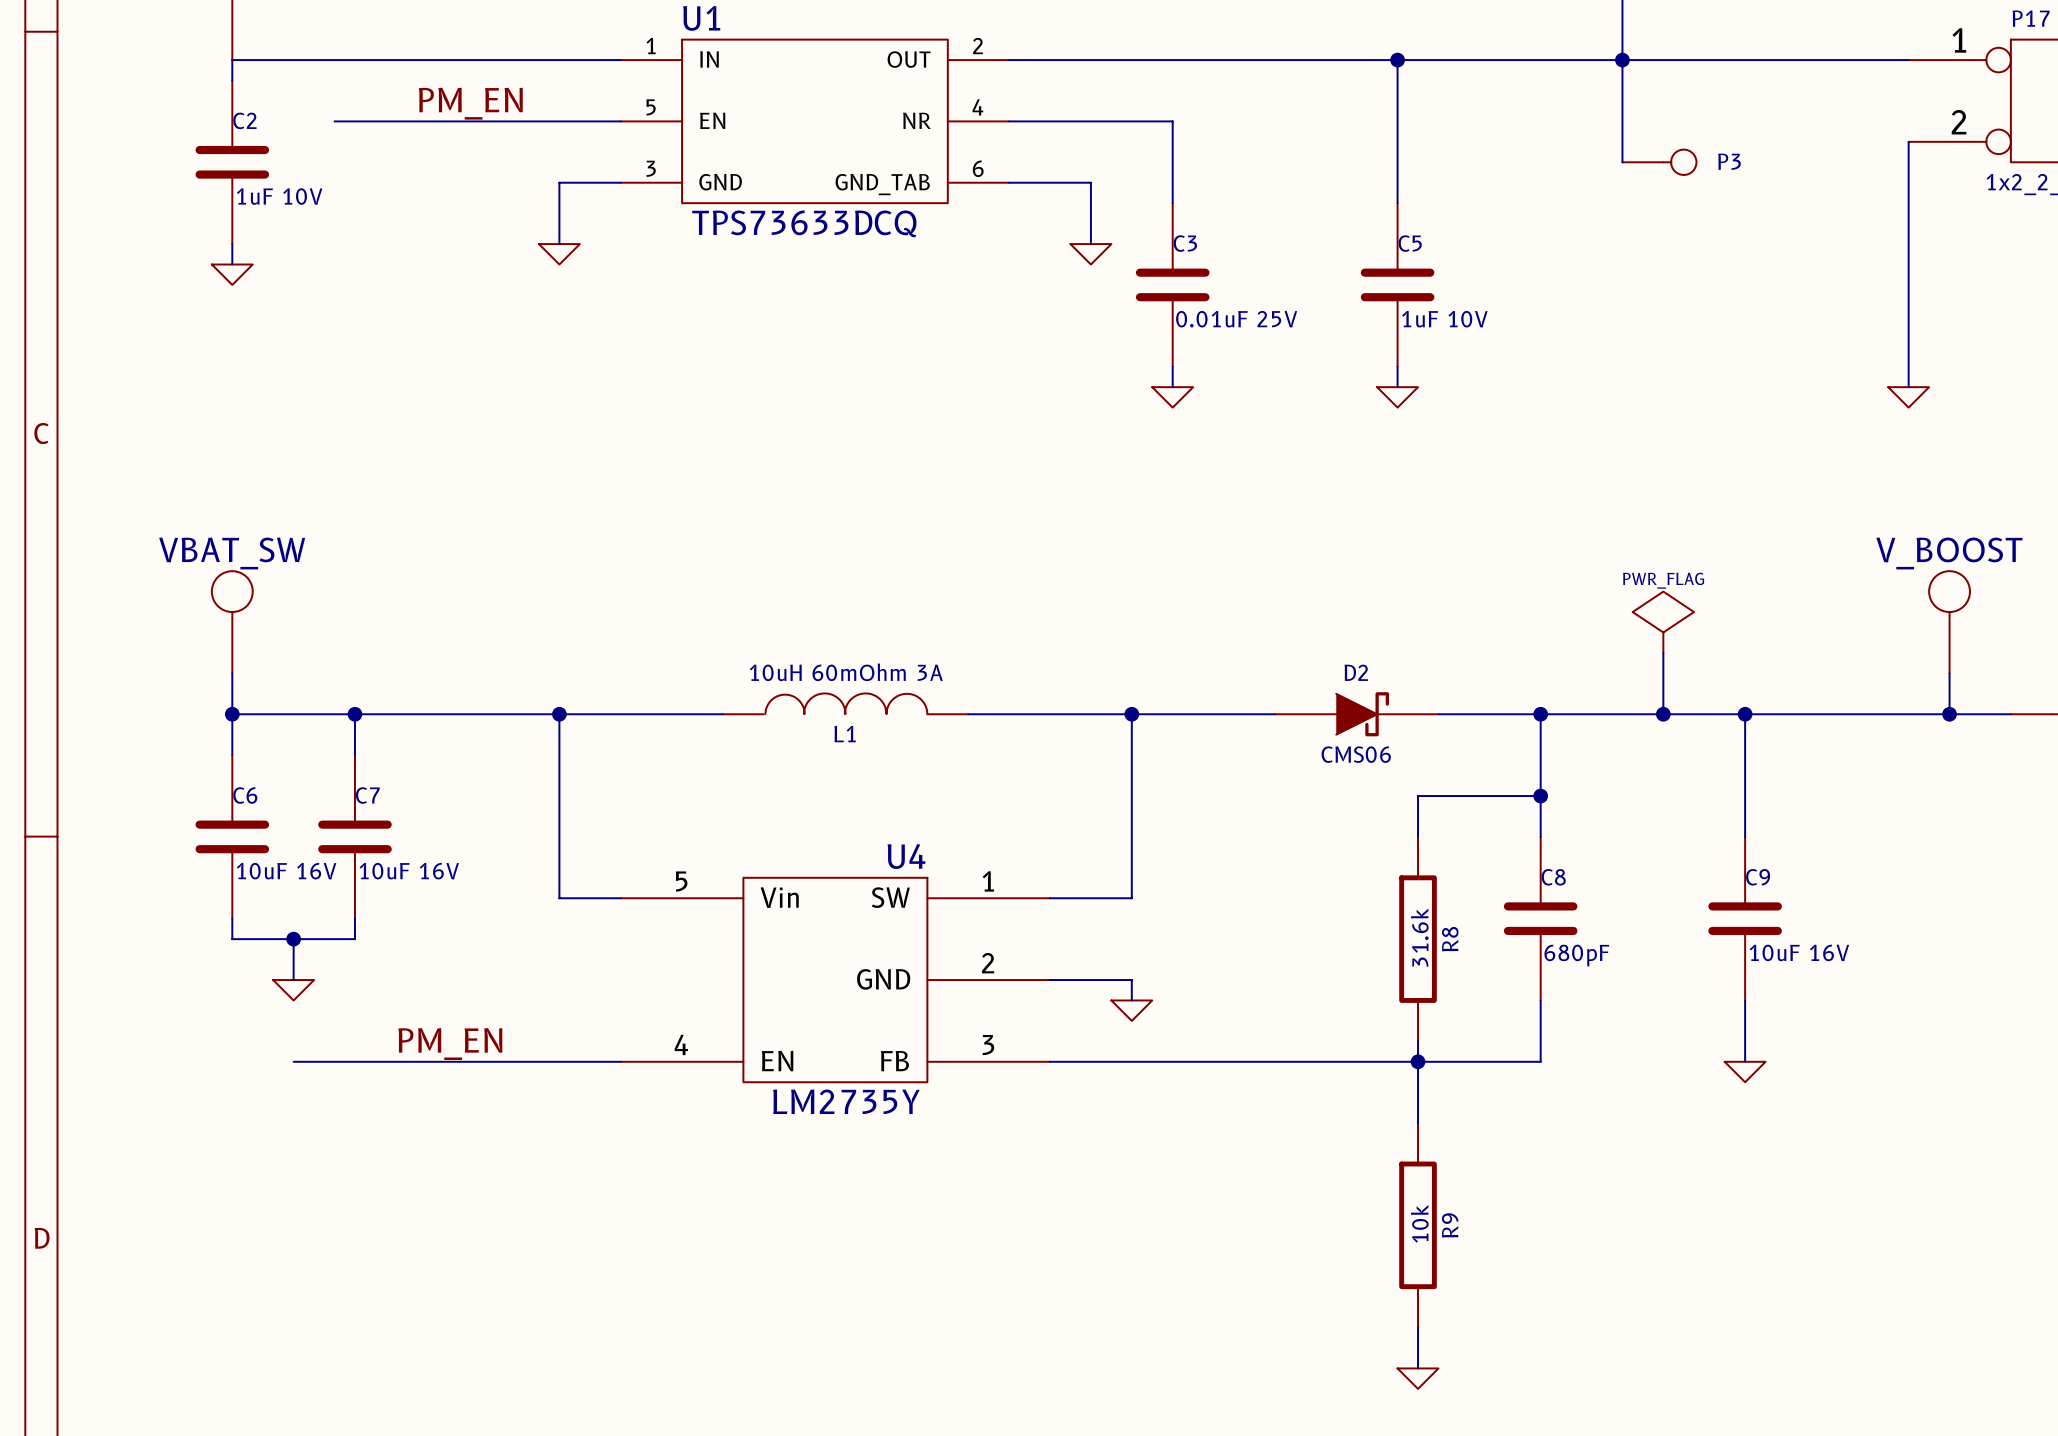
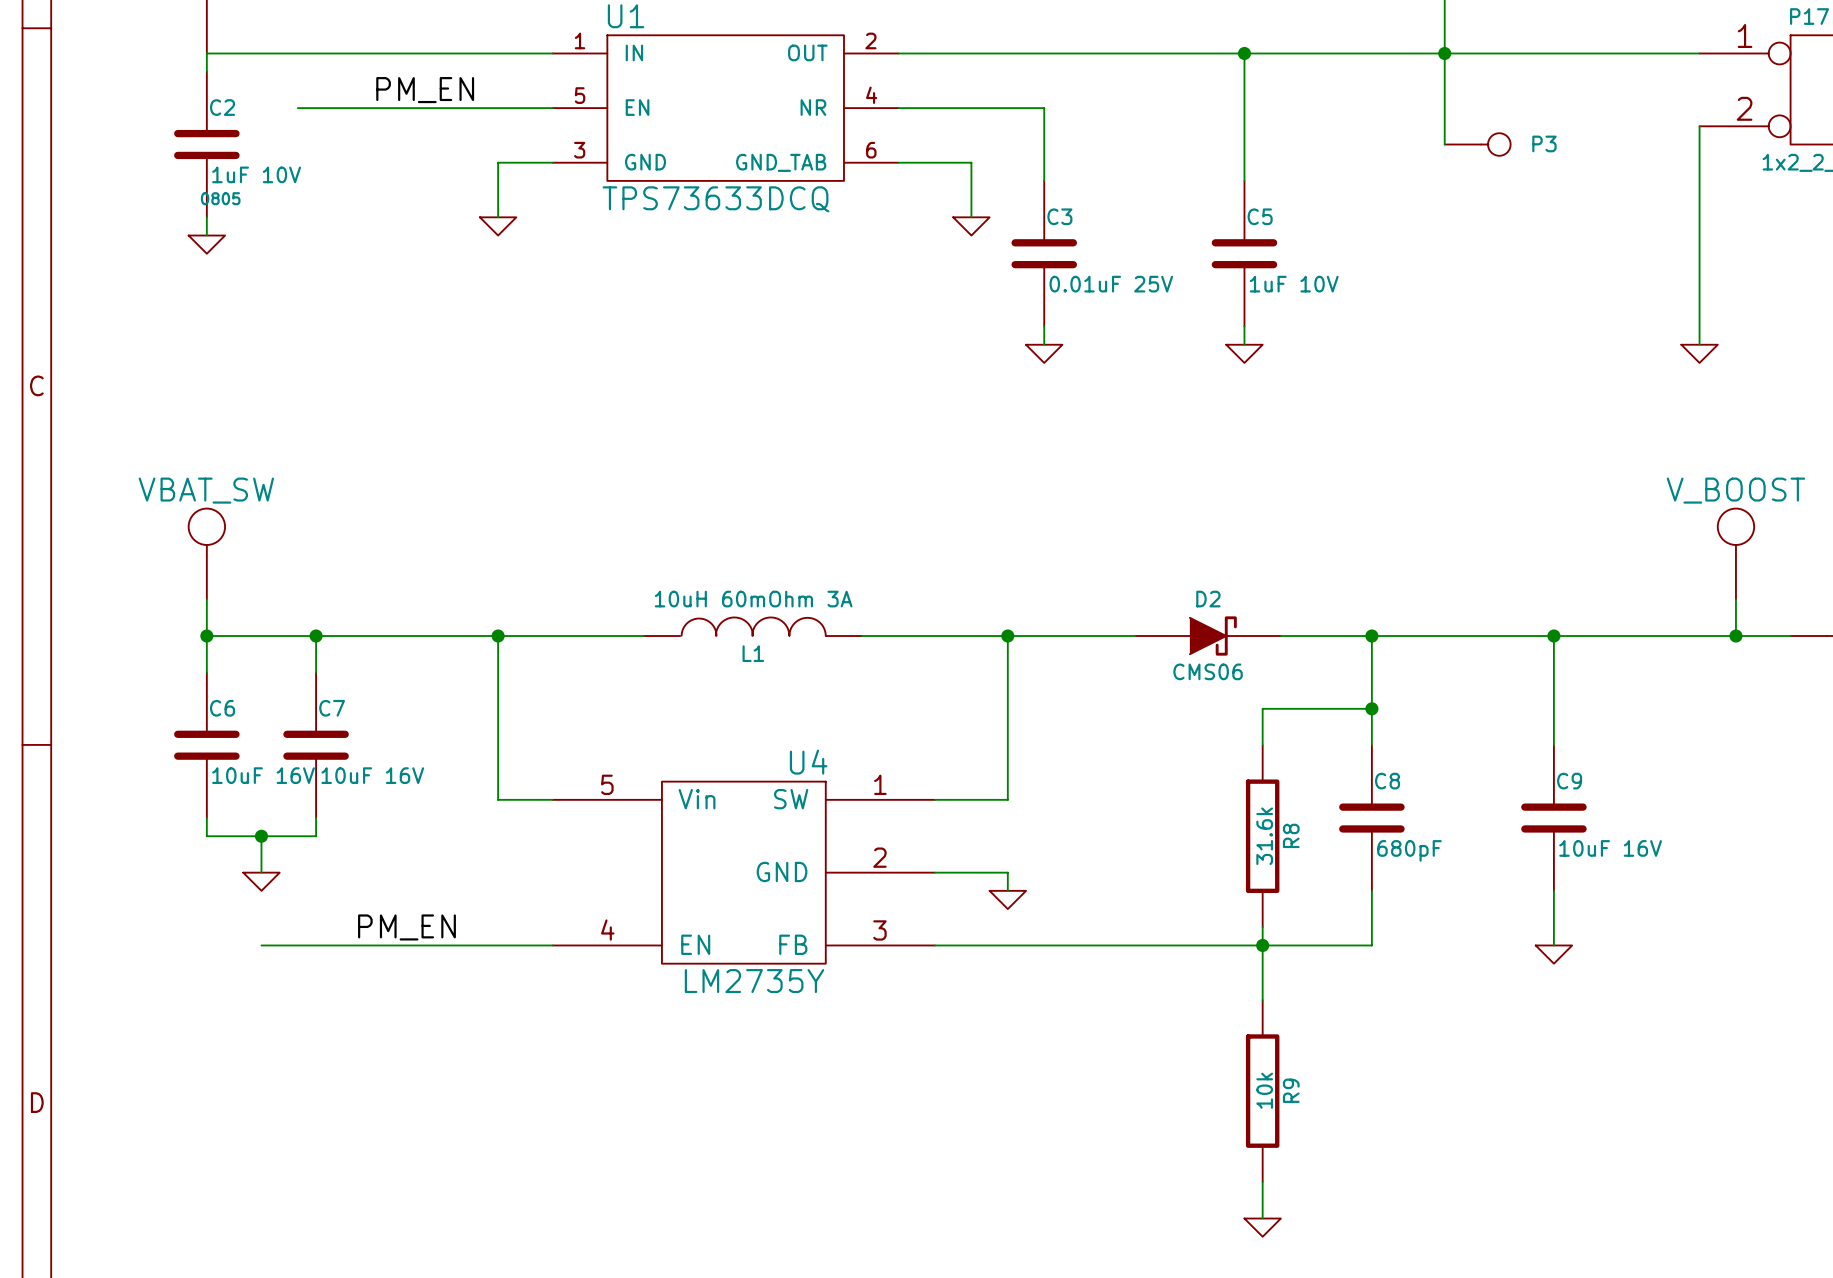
C2 text: none -> 0805 (220, 198)
power symbol: PWR_FLAG (1663, 622) -> none
wire: (1663, 652) (1663, 714) -> none
junction: (1663, 714) -> none

